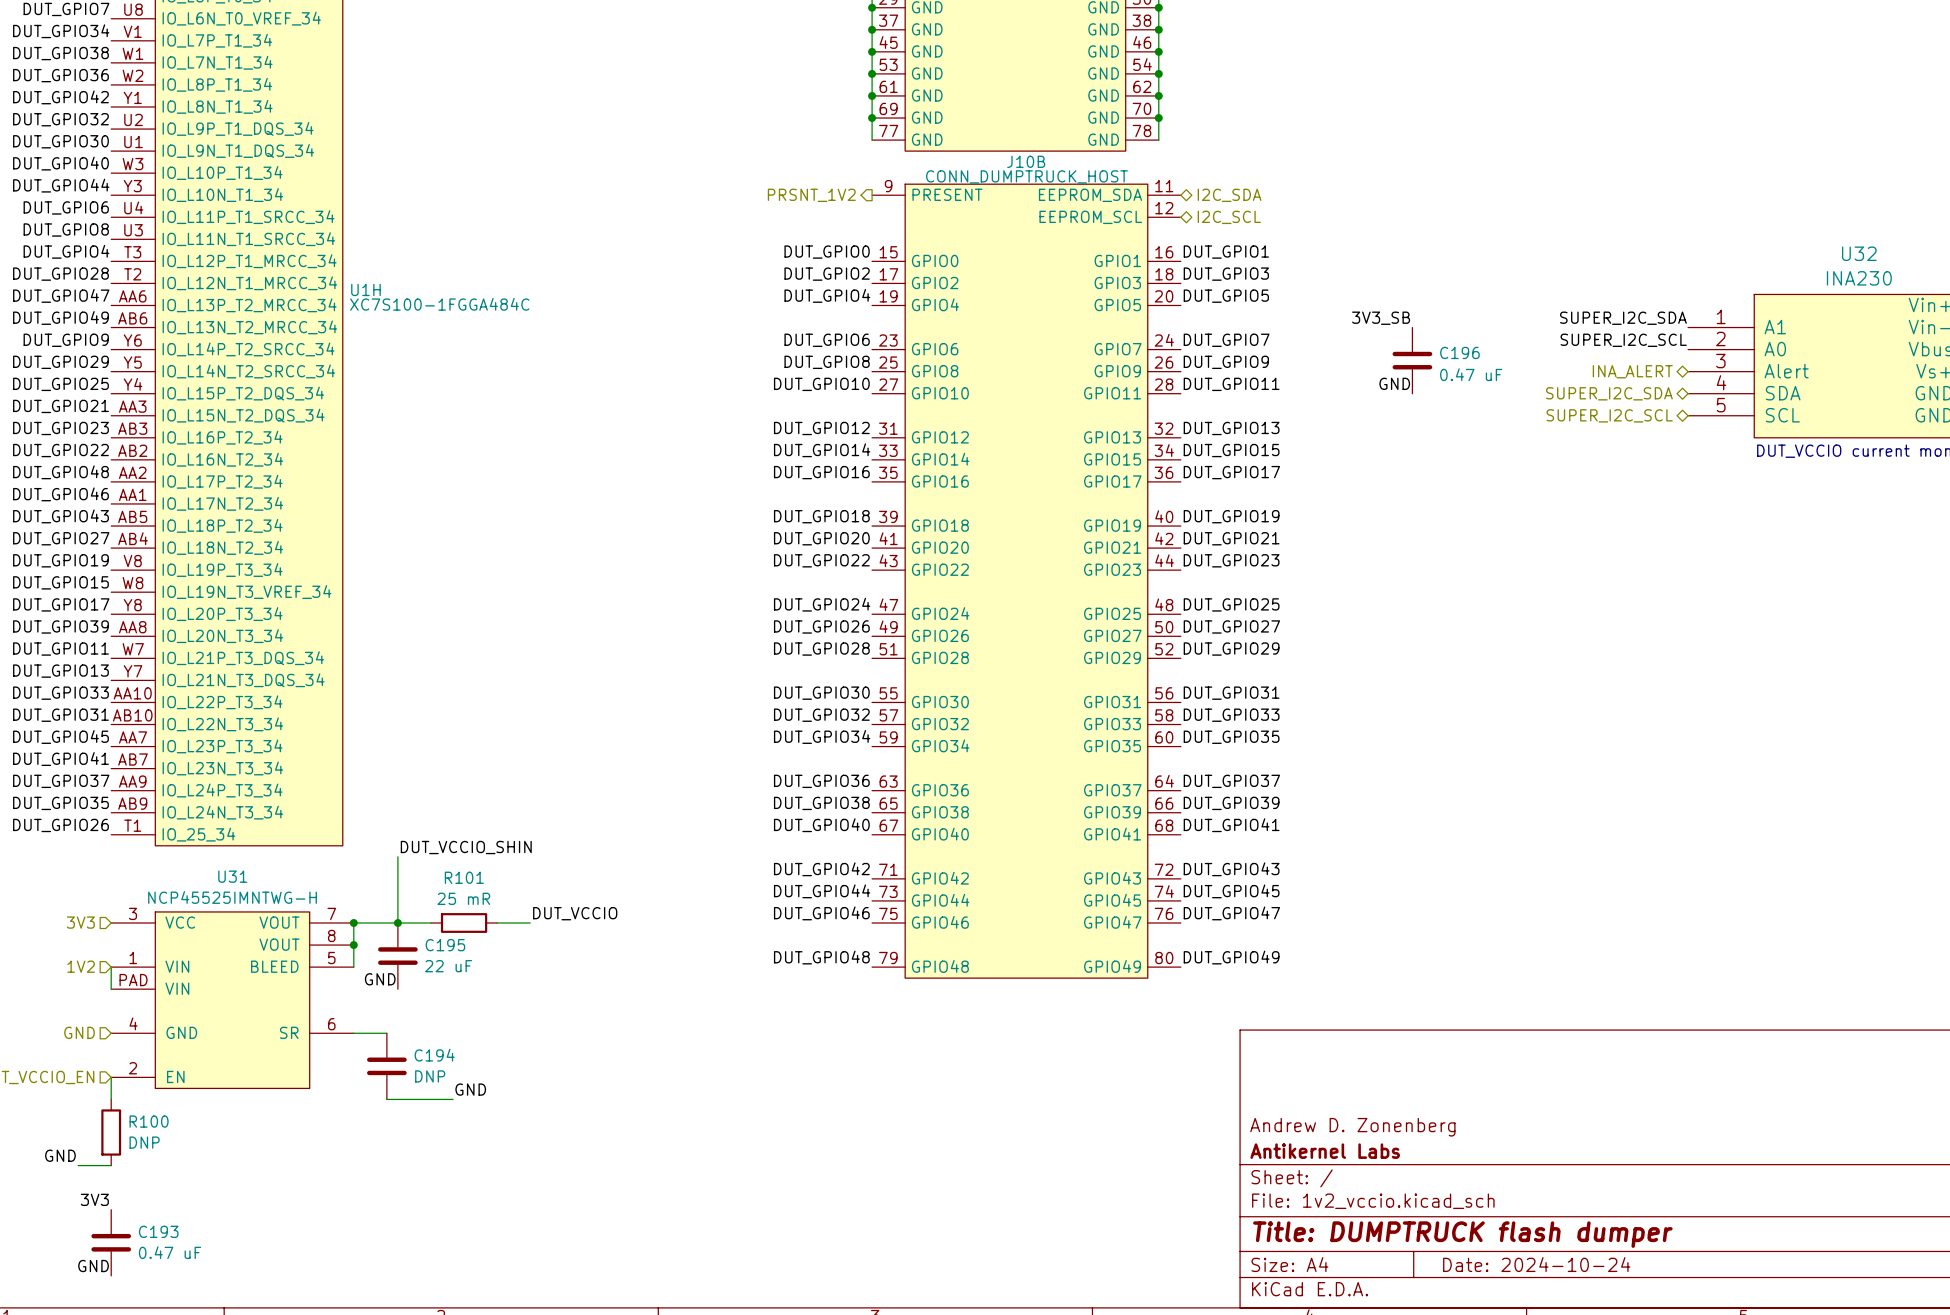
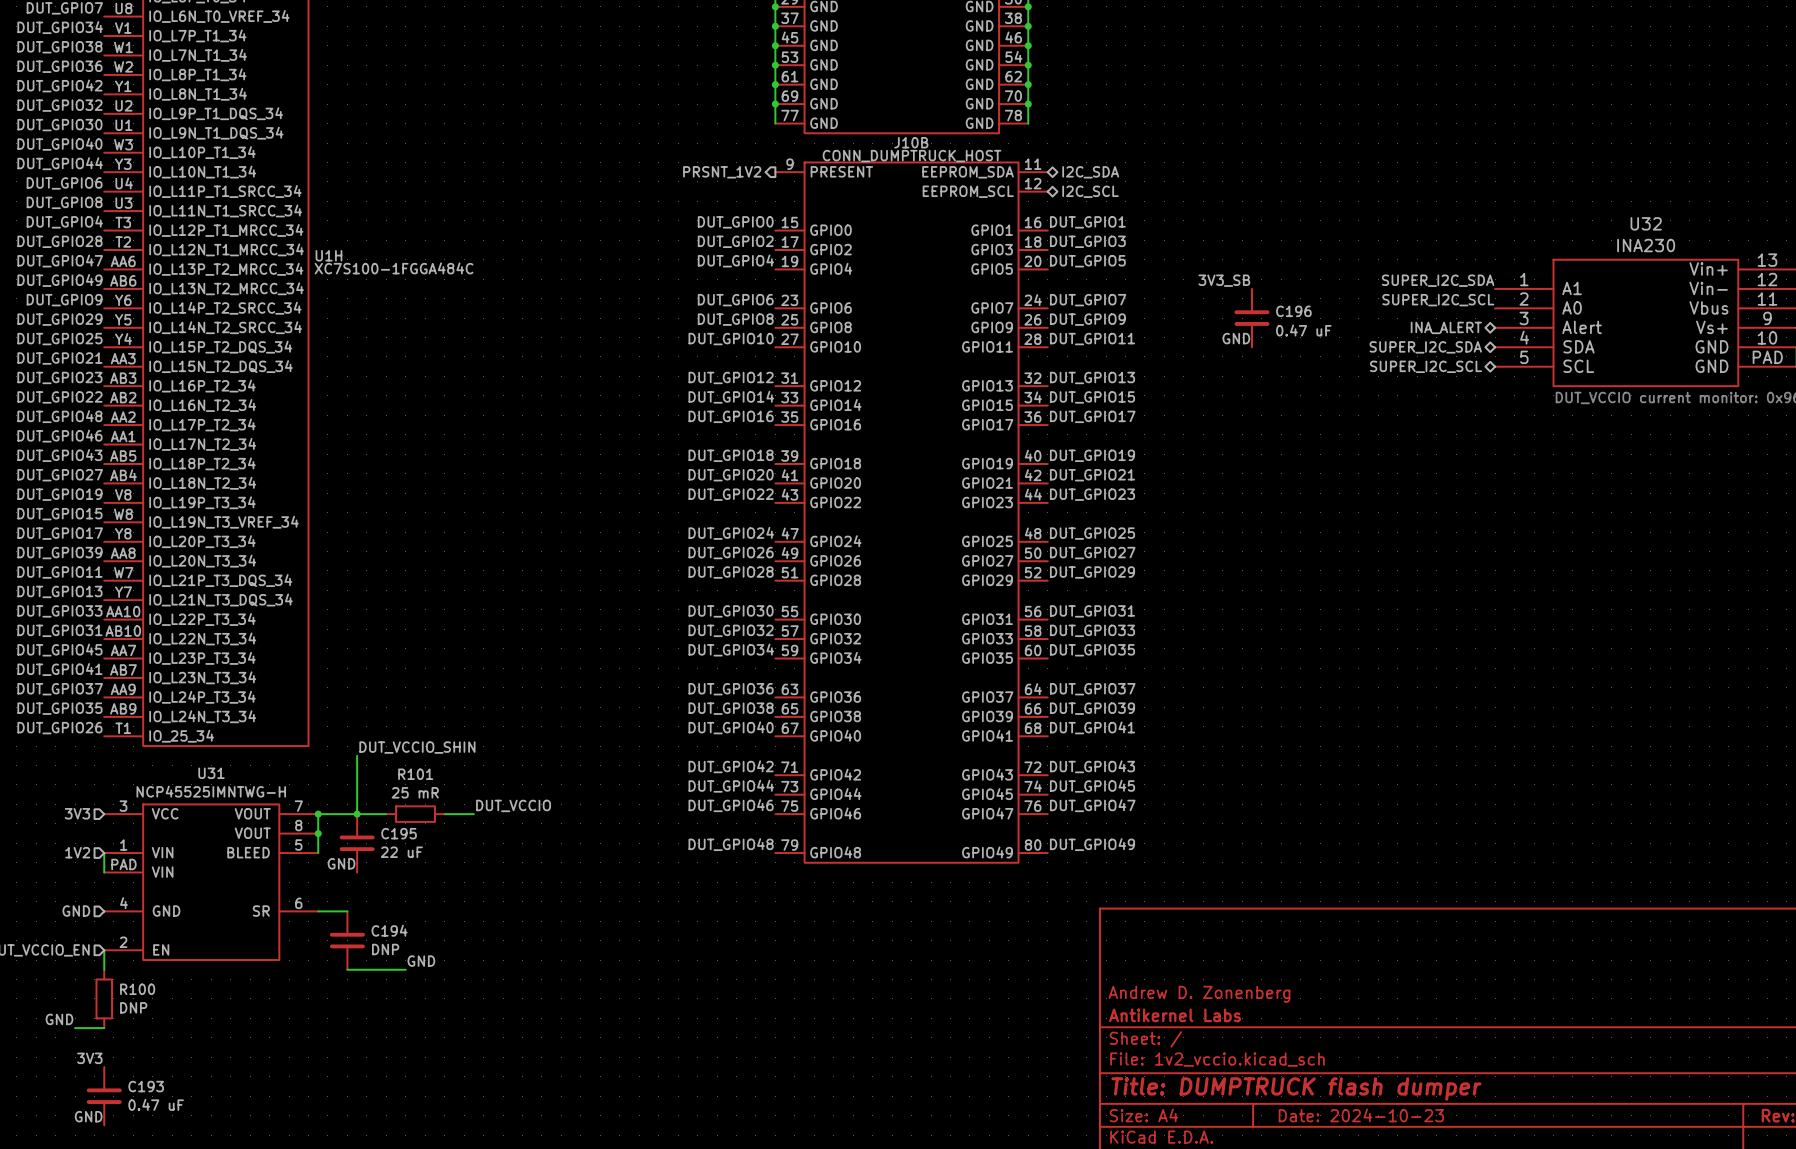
title block: Date: 2024-10-24 (1536, 1264) -> Date: 2024-10-23 (1361, 1115)

